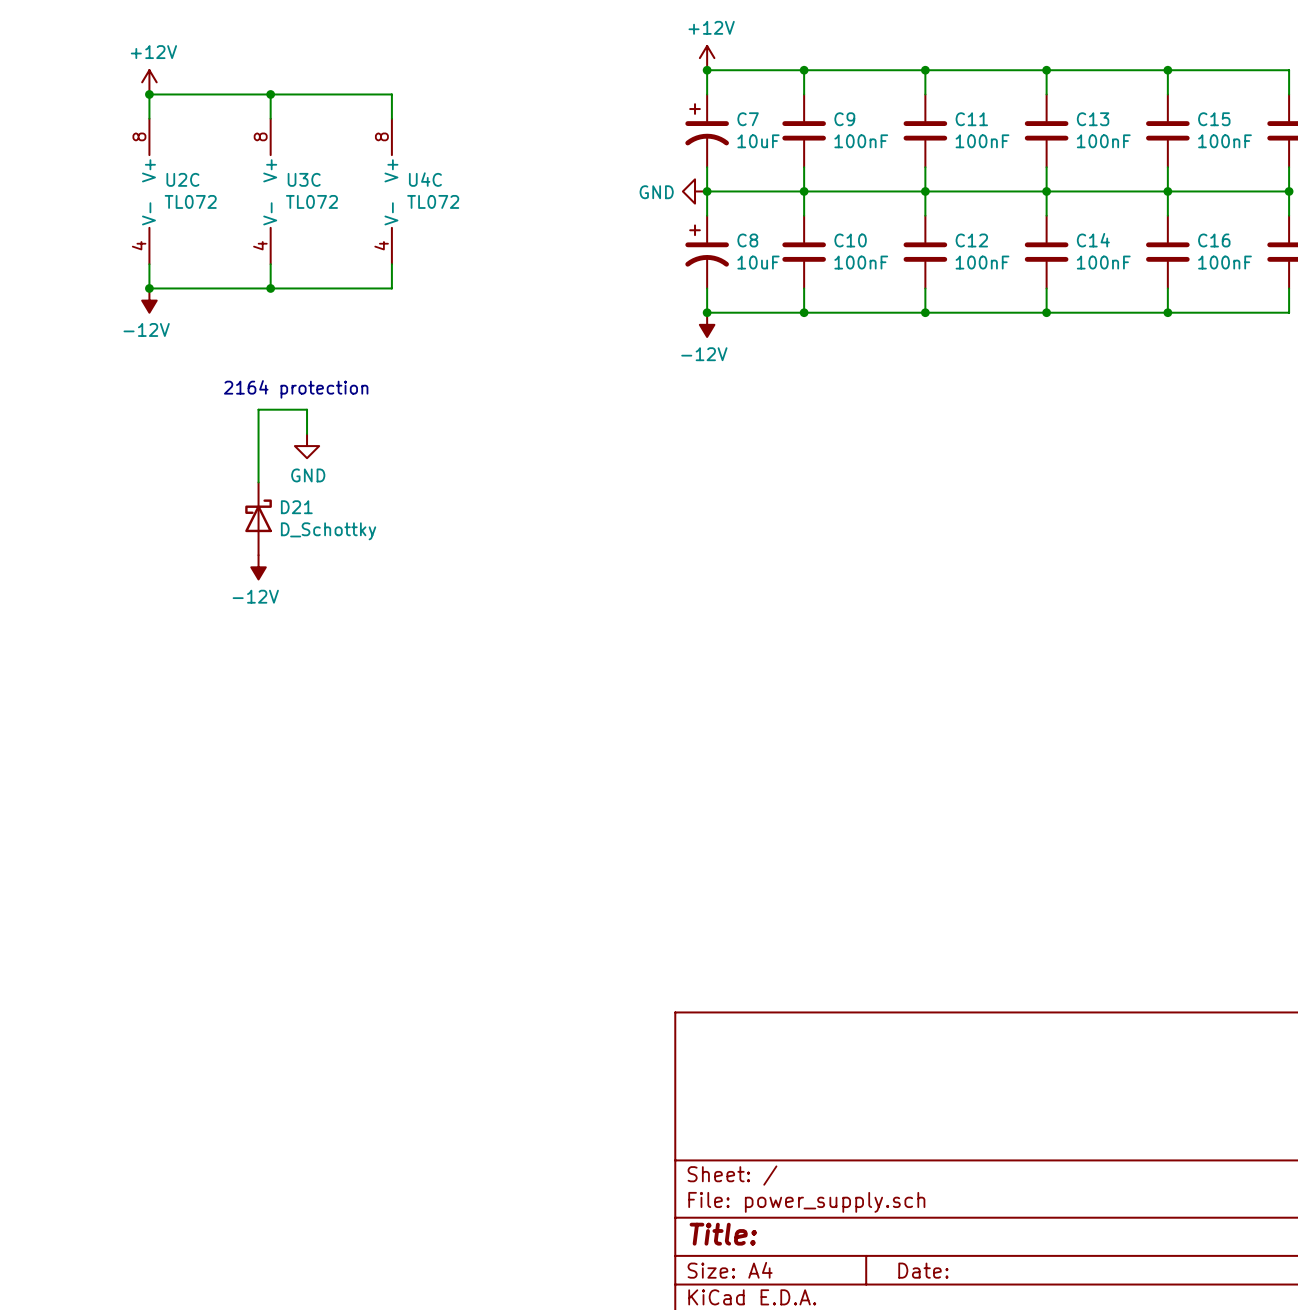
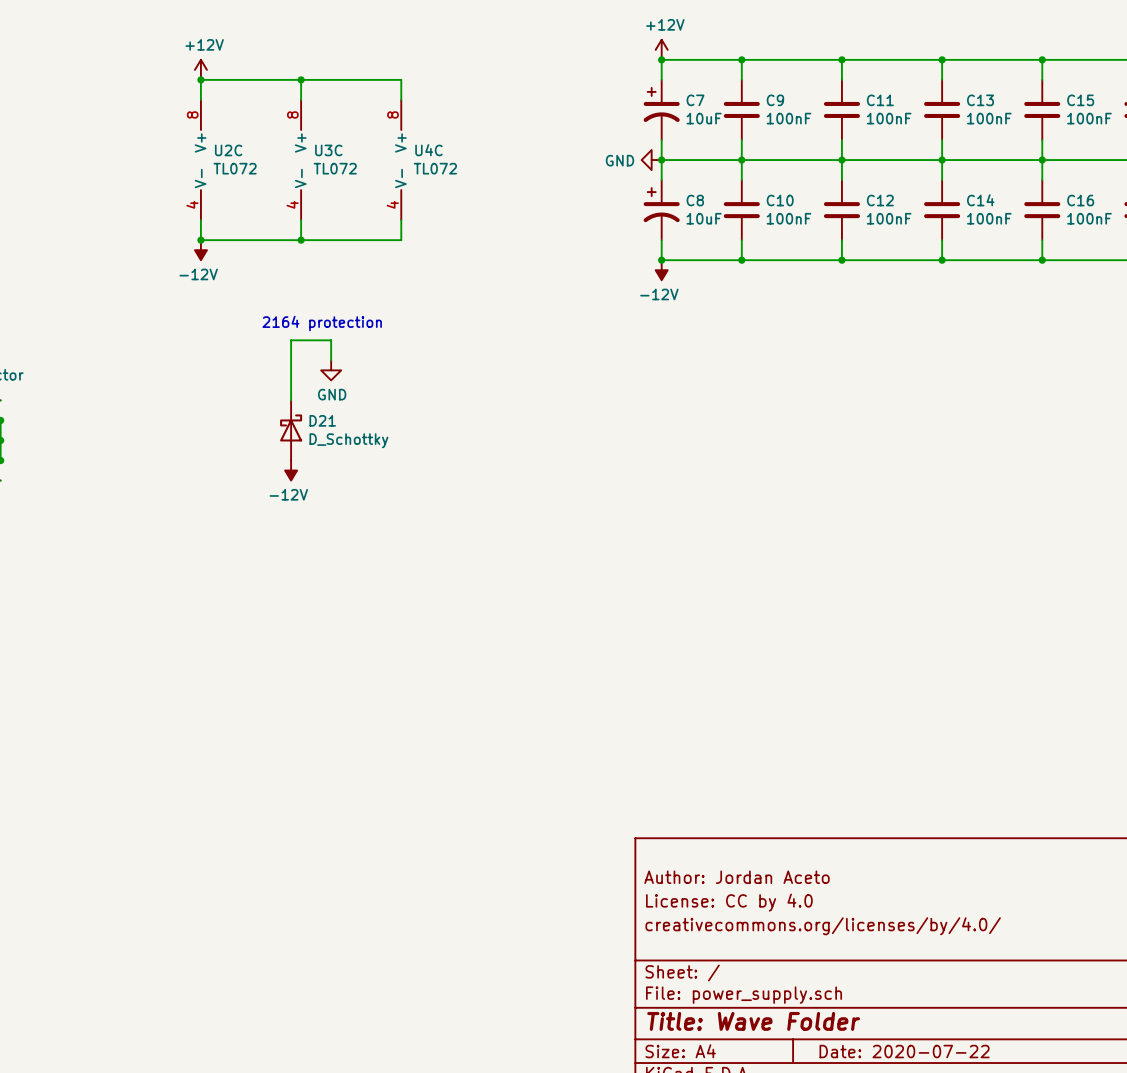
title block: none -> Author: Jordan Aceto (736, 877)
title block: none -> License: CC by 4.0 (729, 902)
title block: none -> creativecommons.org/licenses/by/4.0/ (823, 926)
title block: Title: (723, 1234) -> Title: Wave Folder (753, 1021)
title block: Date: (923, 1270) -> Date: 2020-07-22 (904, 1051)

